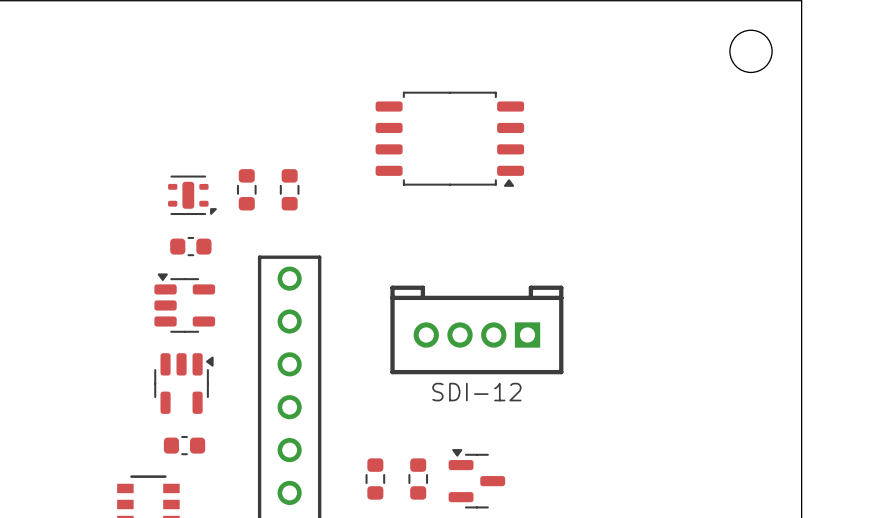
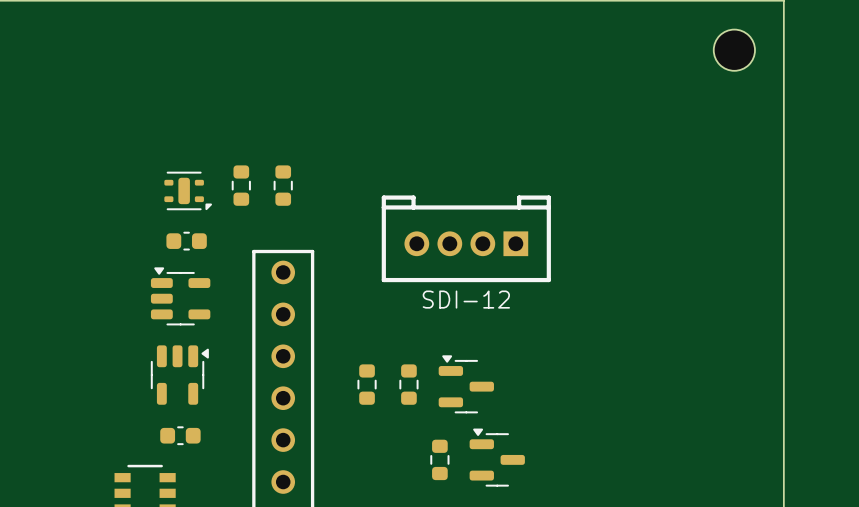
part: (449, 139) -> none
part: none -> (466, 238)
part: (476, 329) -> none
text position: SDI-12 (476, 392) -> SDI-12 (466, 299)
part: none -> (367, 384)
part: none -> (408, 384)
part: none -> (466, 384)
part position: (476, 478) -> (497, 457)
part: (375, 479) -> none
part position: (418, 479) -> (439, 459)

